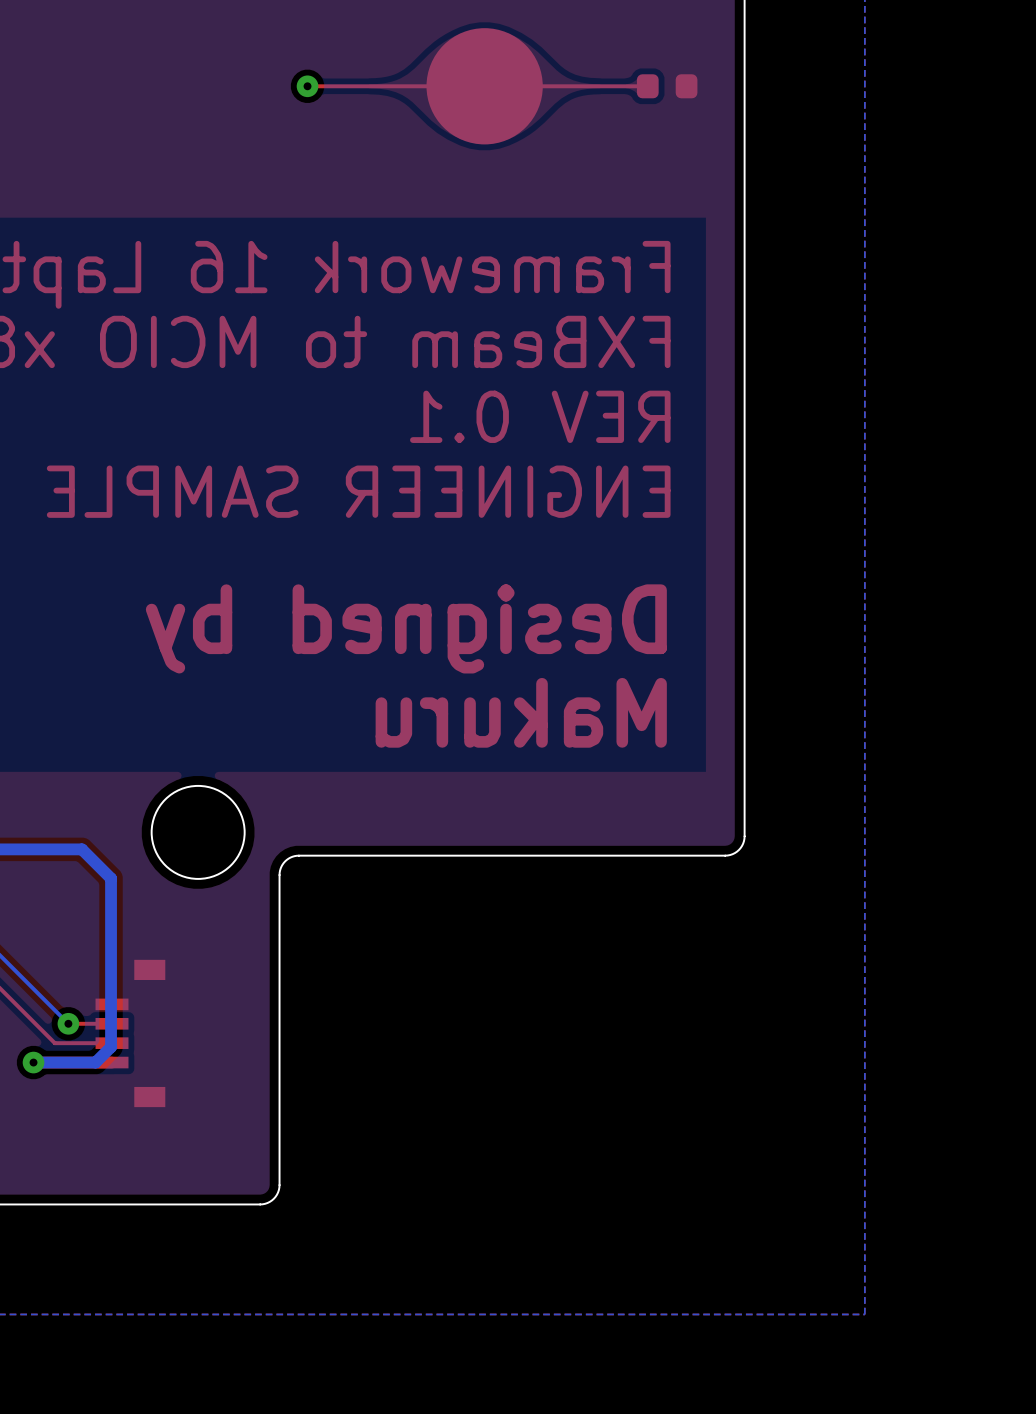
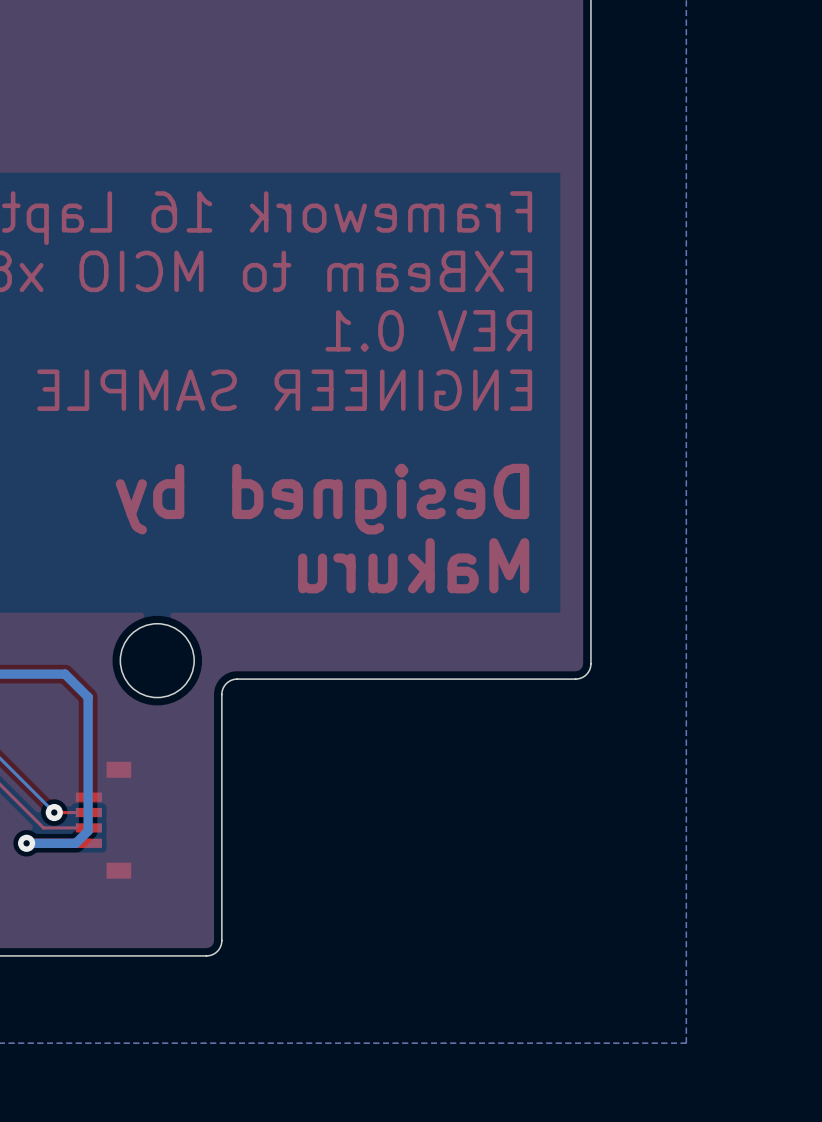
via: (307, 86) -> none
part: (484, 86) -> none
top track: (647, 86) (307, 86) -> none
part: (667, 86) -> none

